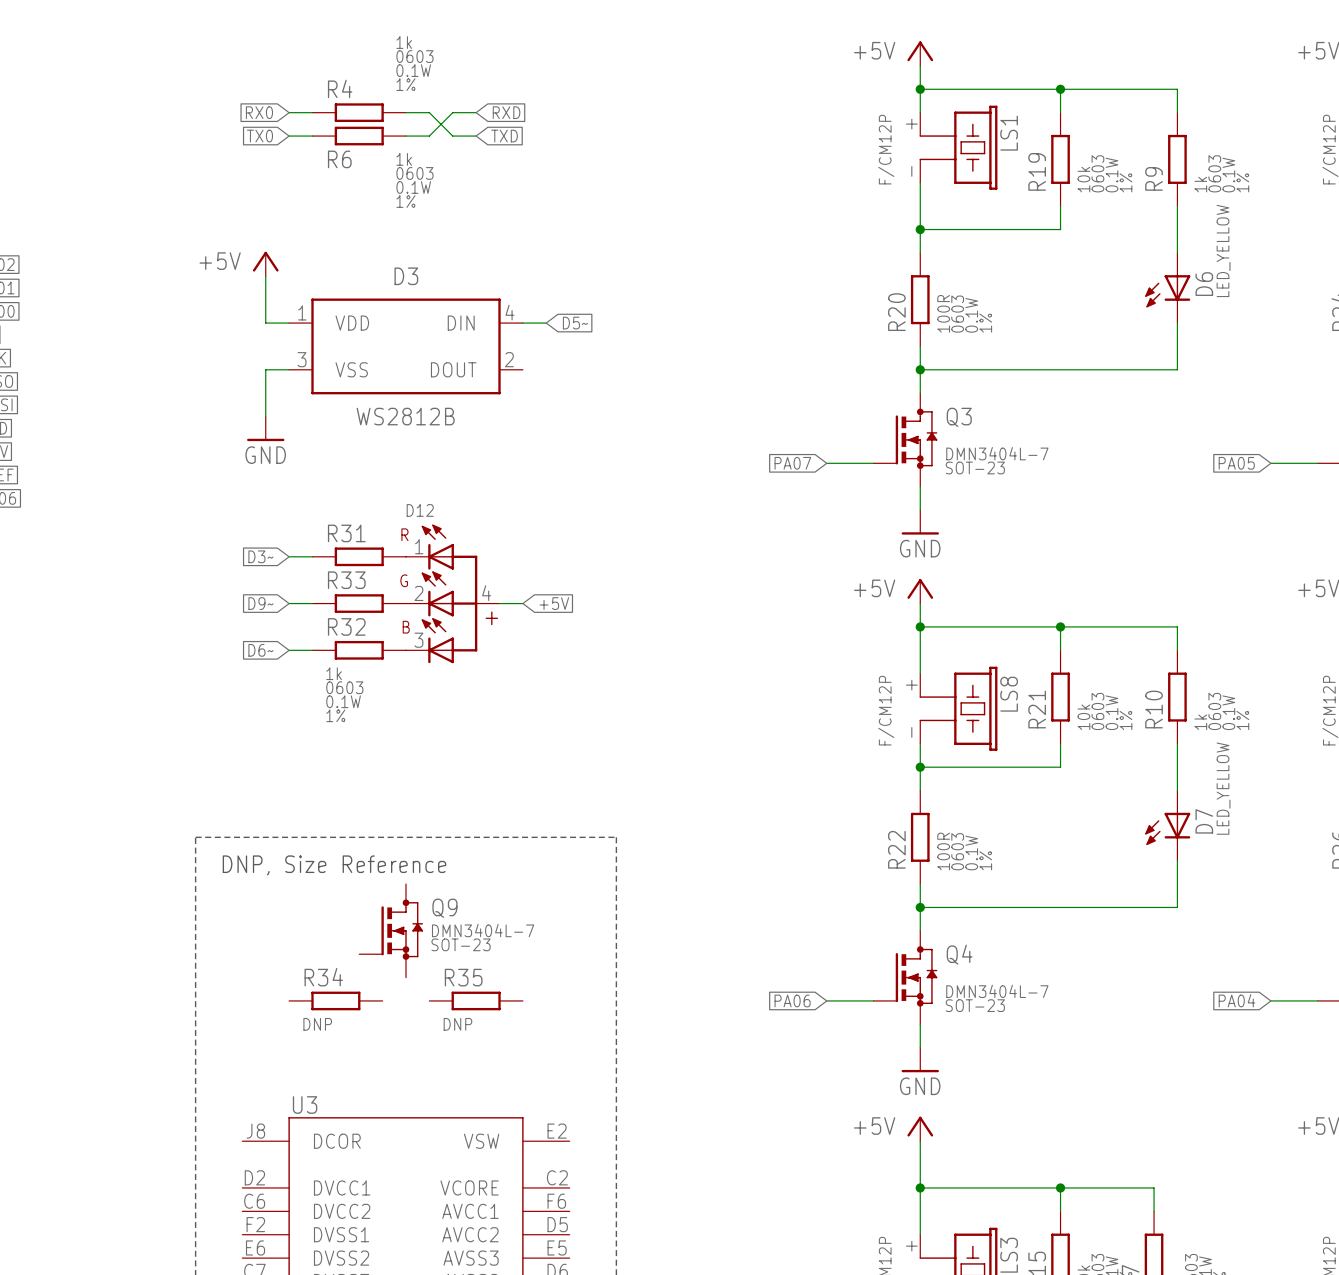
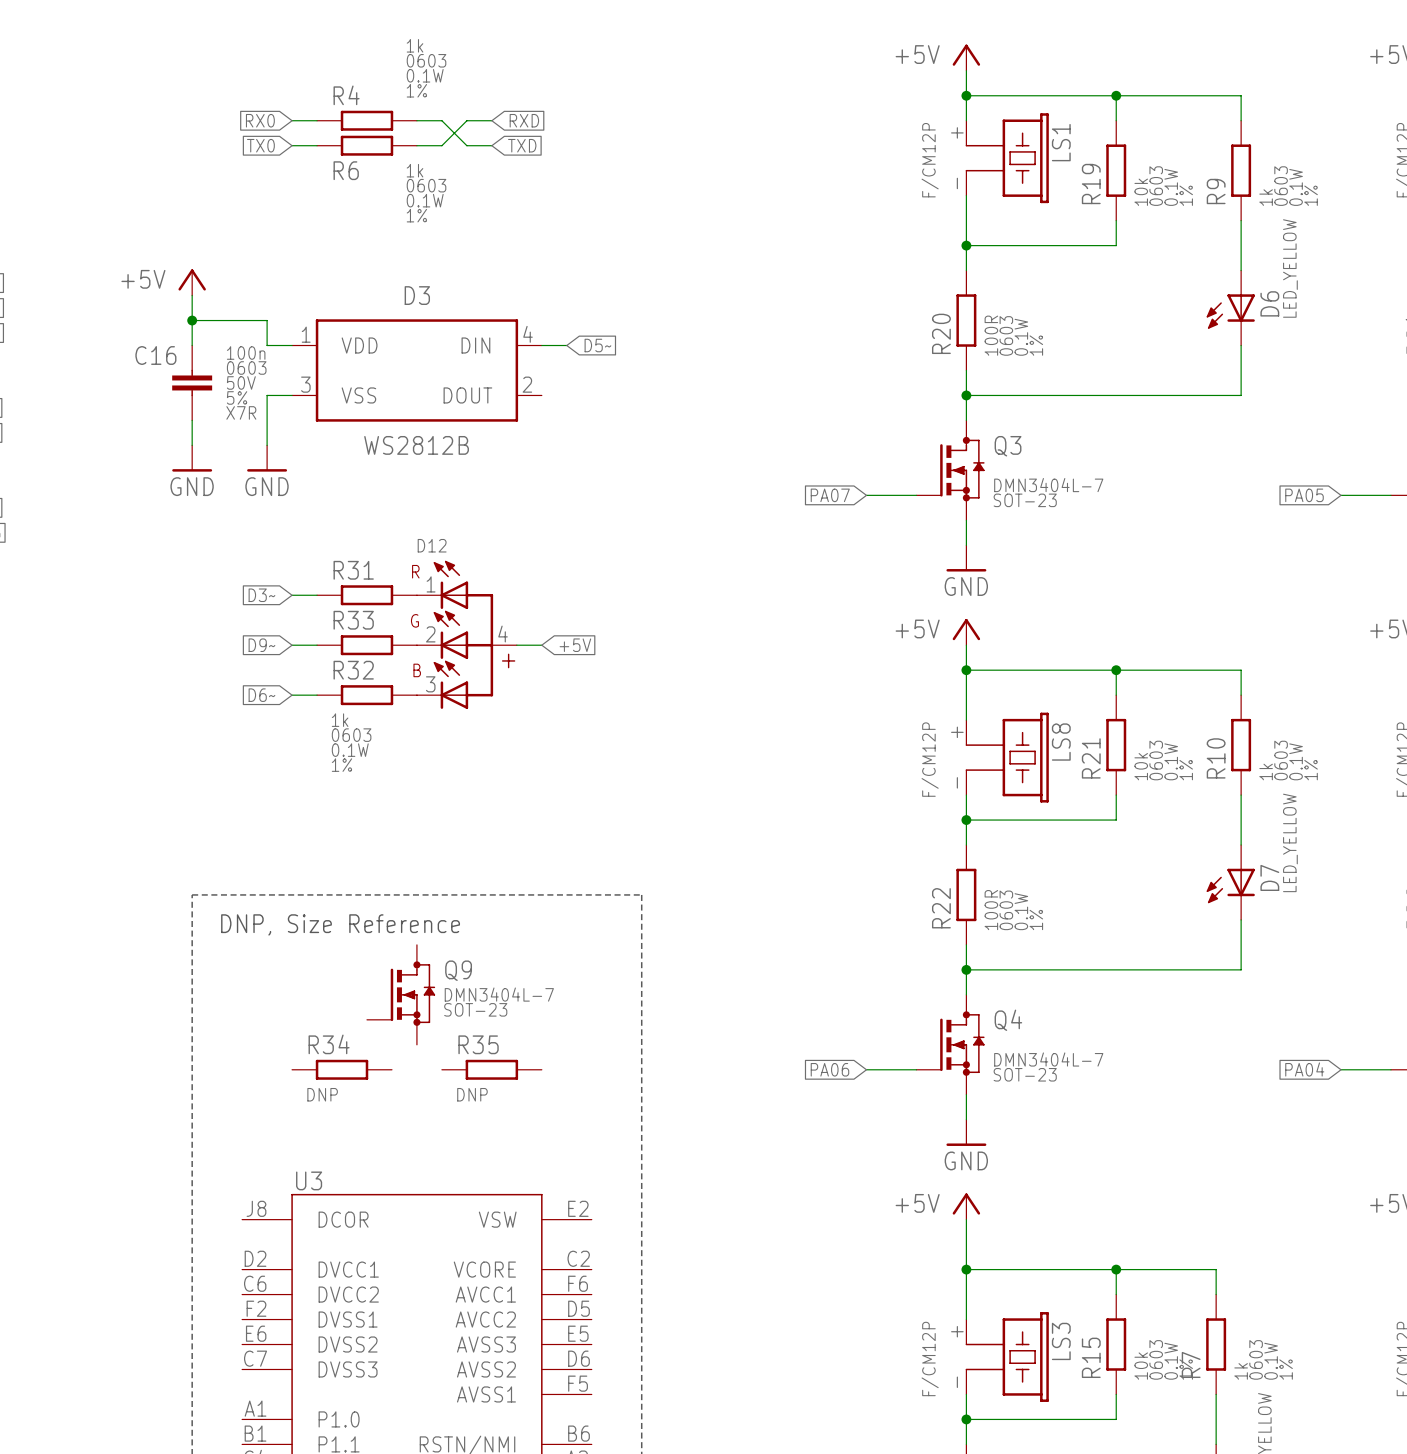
power symbol position: +5V (265, 264) -> +5V (192, 282)
wire: none -> (192, 295) (192, 345)
wire: (265, 276) (265, 299) -> (192, 320) (267, 320)
junction: none -> (192, 320)
C16: none -> 100n (192, 382)
wire: none -> (192, 420) (192, 445)
power symbol: none -> GND (192, 458)

